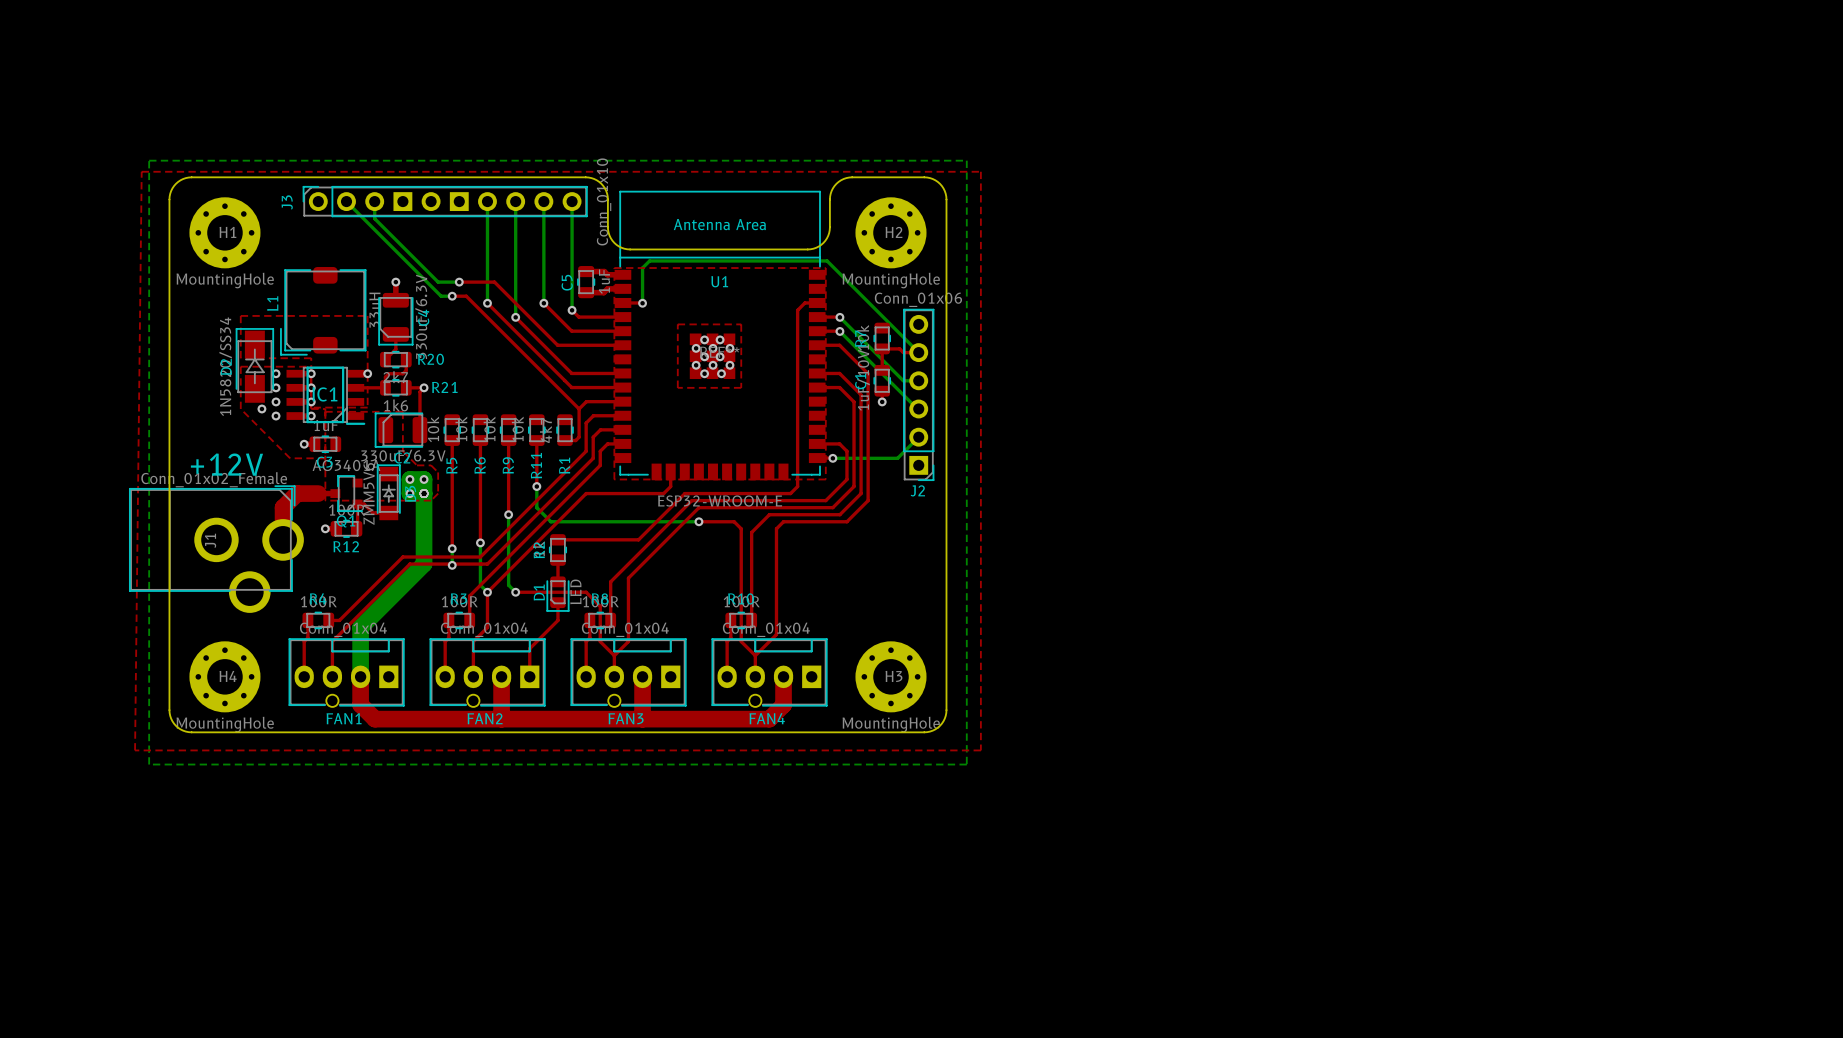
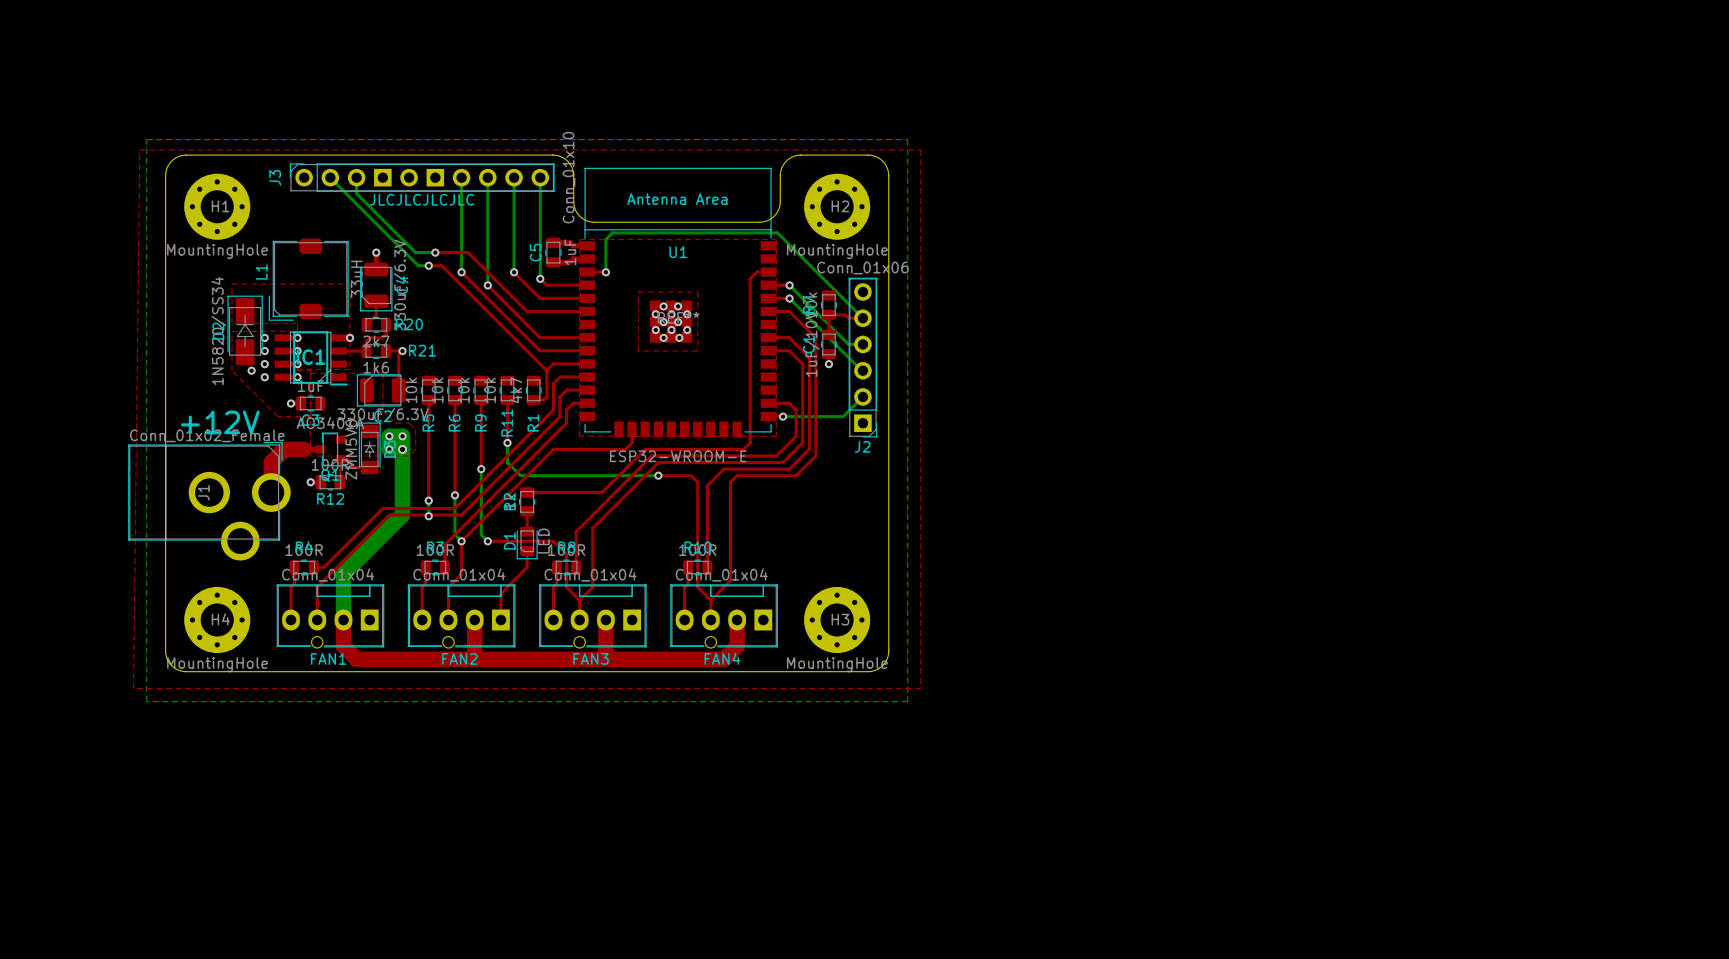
text: none -> JLCJLCJLCJLC (421, 199)

